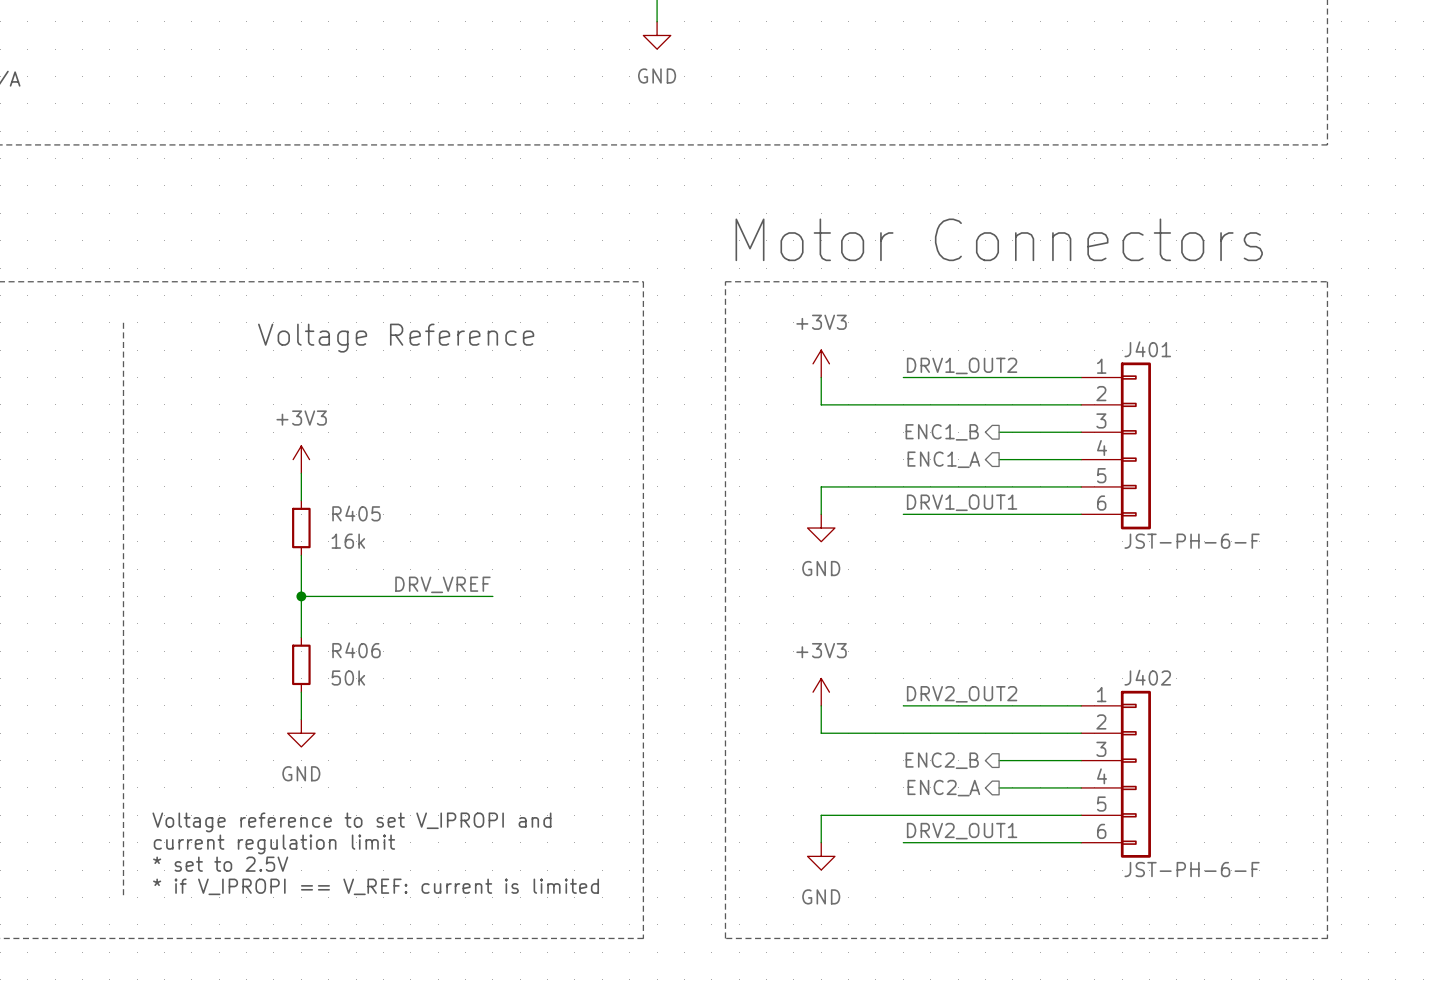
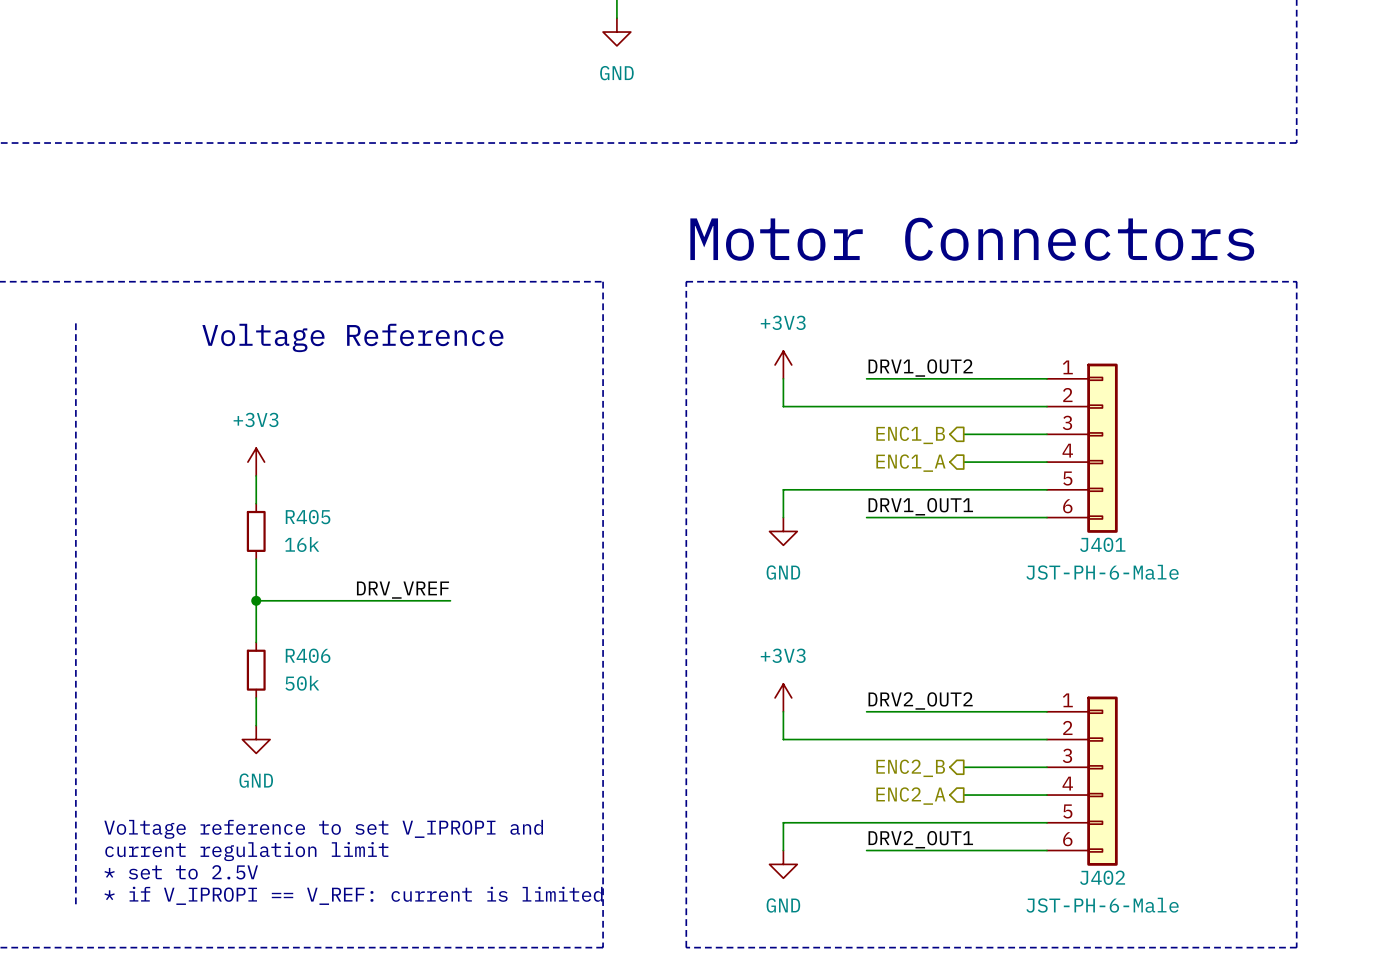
J401 name position: J401 (1147, 349) -> J401 (1102, 544)
J401 value: JST-PH-6-F (1192, 541) -> JST-PH-6-Male (1102, 572)
J402 name position: J402 (1147, 677) -> J402 (1102, 877)
J402 value: JST-PH-6-F (1192, 869) -> JST-PH-6-Male (1102, 905)

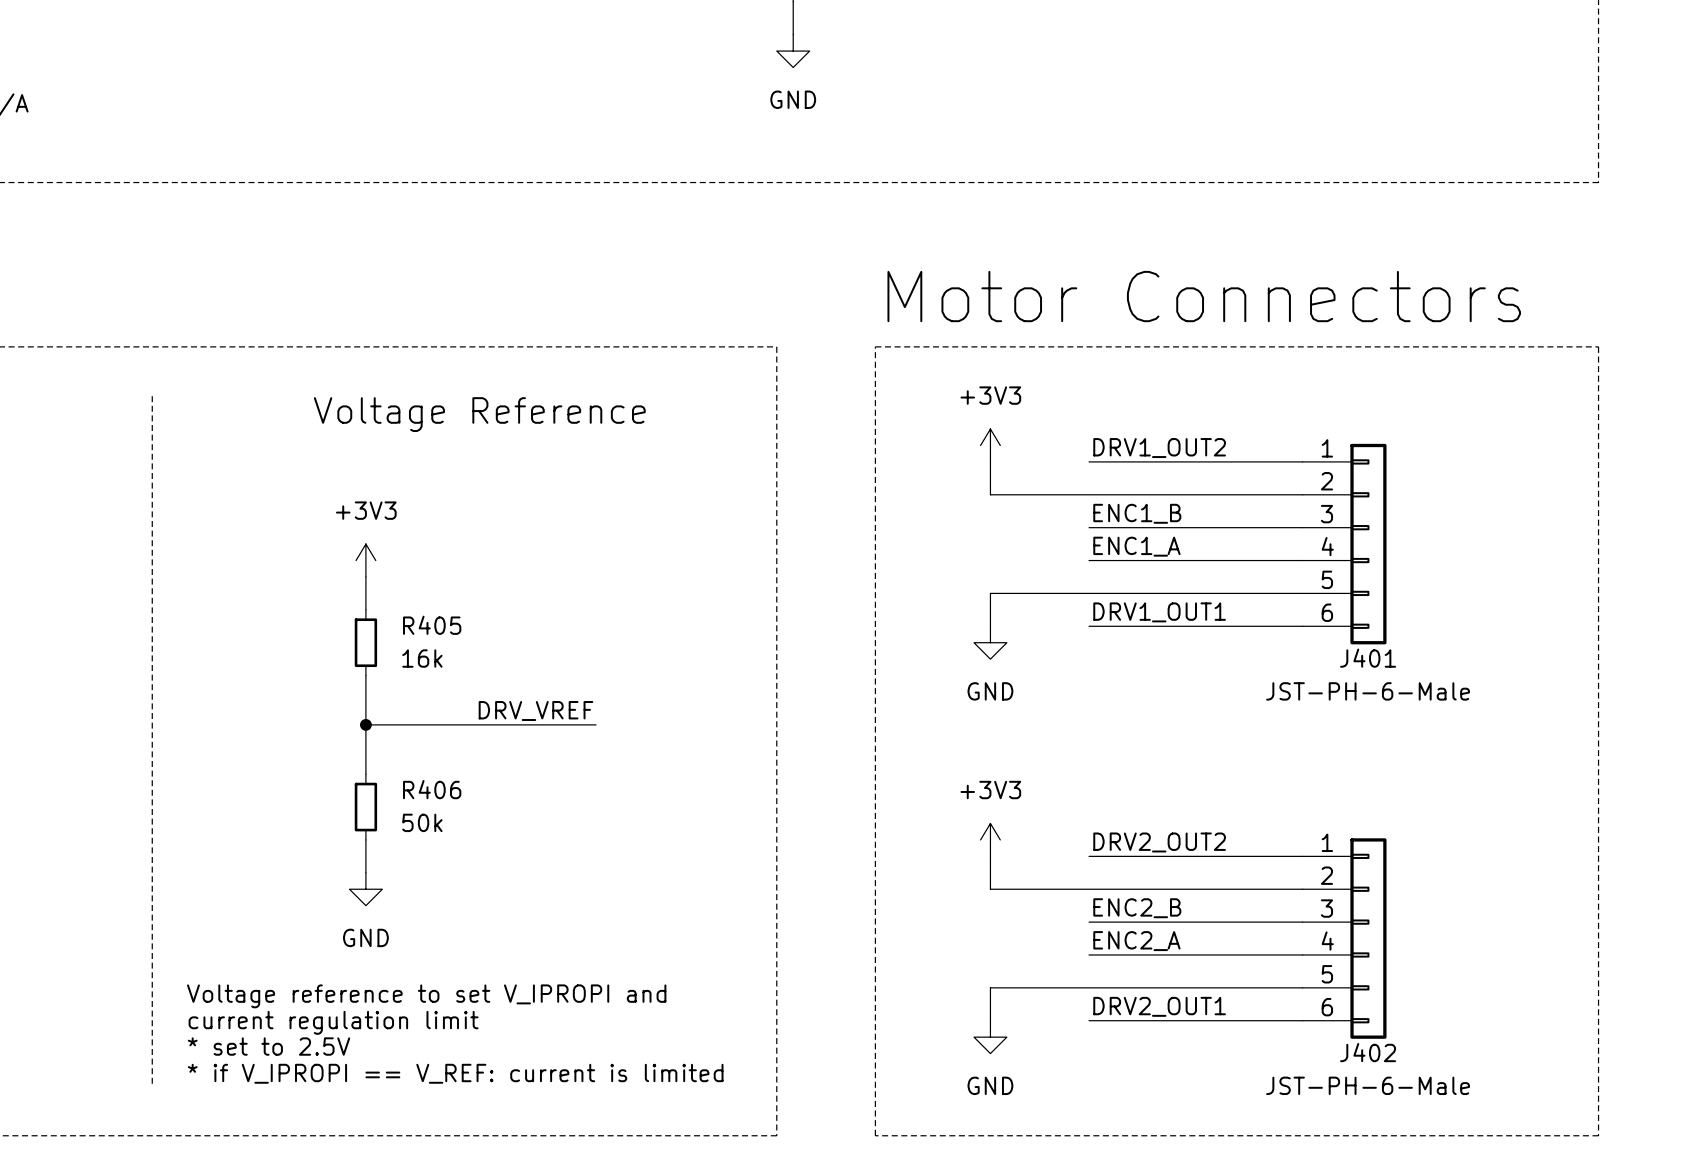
label: none -> ENC1_B (1137, 513)
wire: none -> (1089, 527) (1204, 527)
hierarchical label: ENC1_B (910, 435) -> none
label: none -> ENC1_A (1136, 546)
wire: none -> (1089, 560) (1204, 560)
hierarchical label: ENC1_A (910, 463) -> none
label: none -> ENC2_B (1137, 908)
wire: none -> (1089, 922) (1204, 922)
hierarchical label: ENC2_B (910, 768) -> none
label: none -> ENC2_A (1136, 941)
wire: none -> (1089, 954) (1204, 954)
hierarchical label: ENC2_A (910, 796) -> none

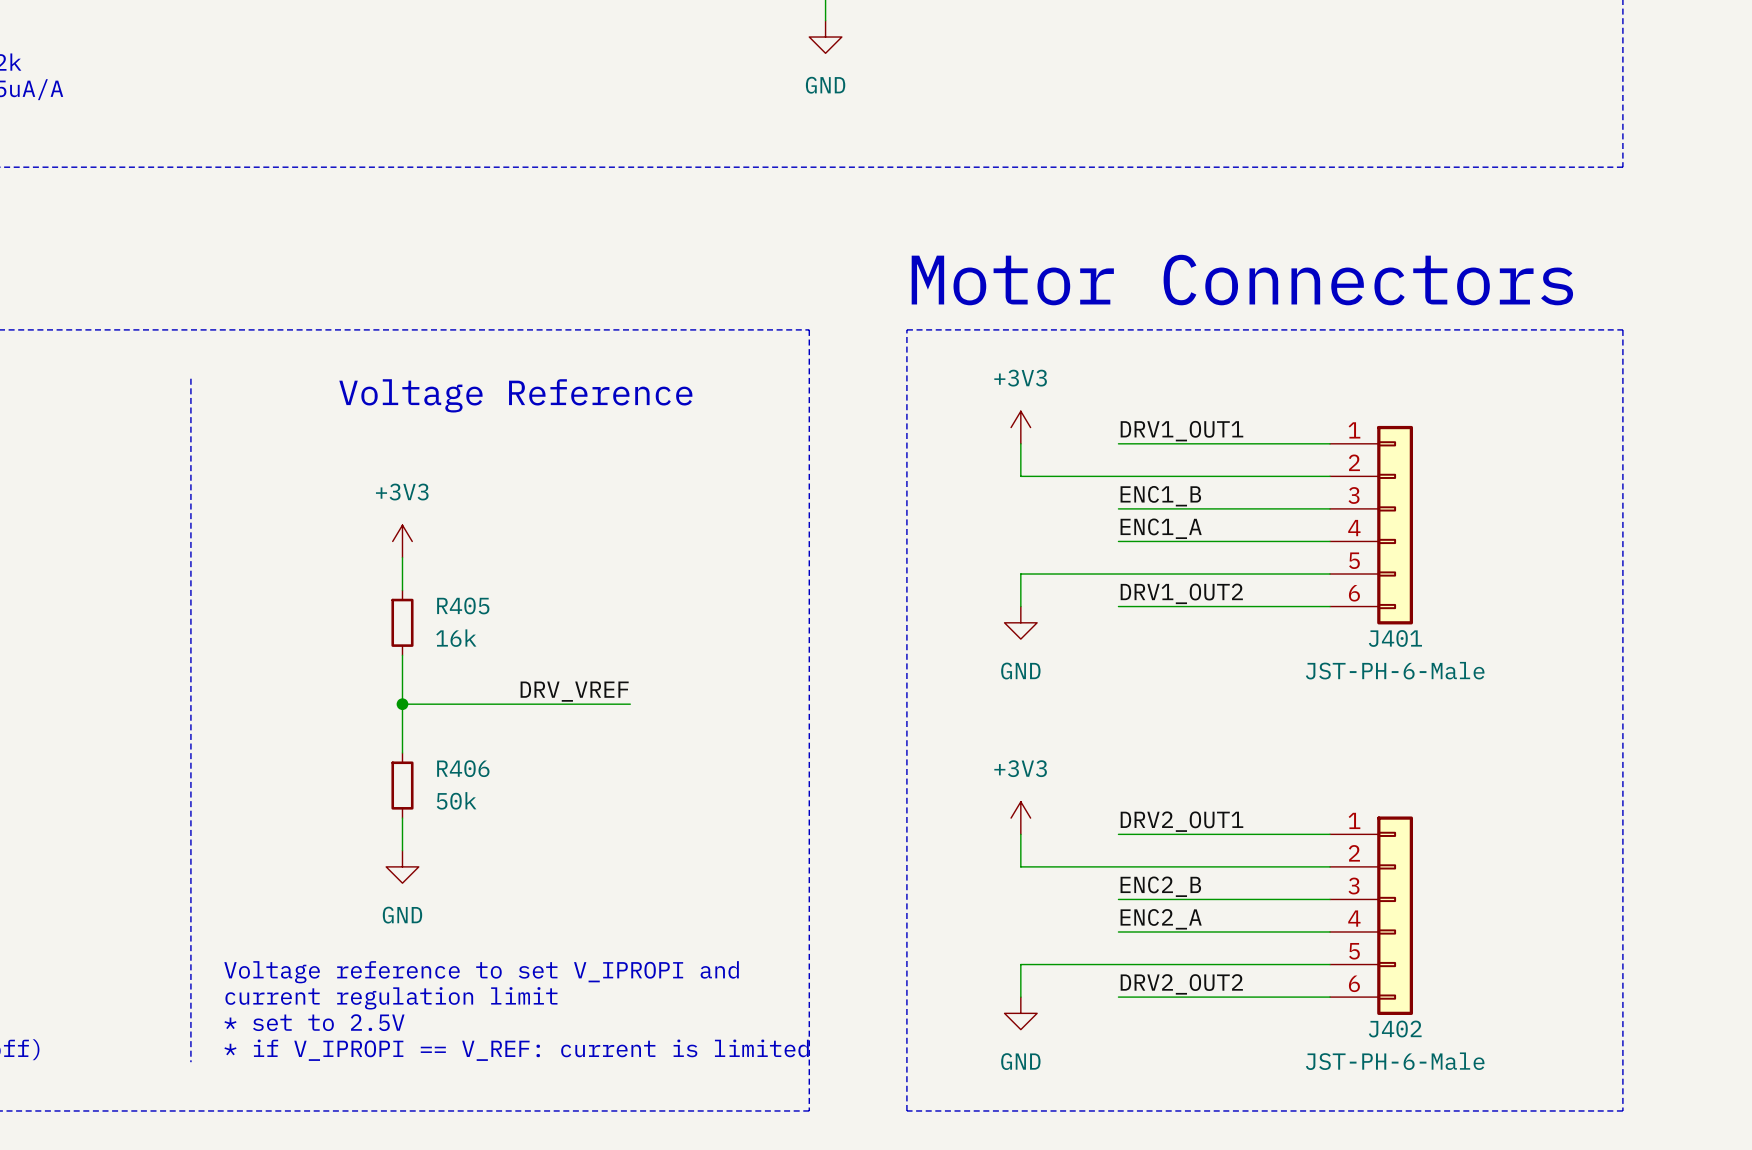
label: DRV1_OUT2 (1159, 448) -> DRV1_OUT1 (1181, 431)
label: DRV1_OUT1 (1159, 612) -> DRV1_OUT2 (1181, 593)
label: DRV2_OUT2 (1159, 842) -> DRV2_OUT1 (1181, 821)
label: DRV2_OUT1 (1159, 1006) -> DRV2_OUT2 (1181, 984)

